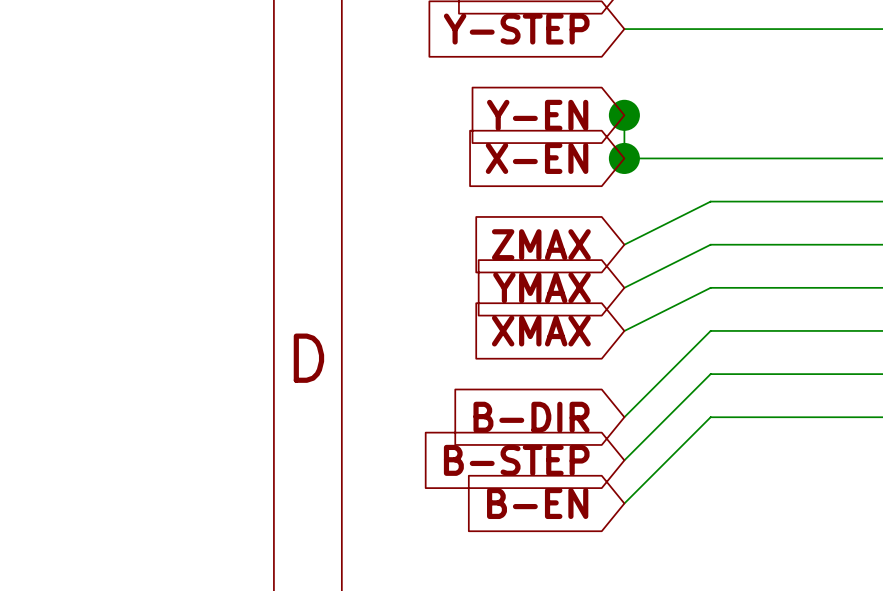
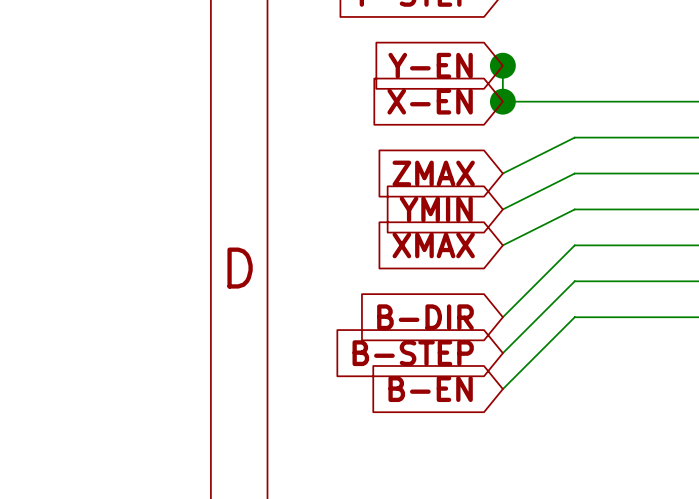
global label: YMAX (541, 287) -> YMIN (436, 209)

